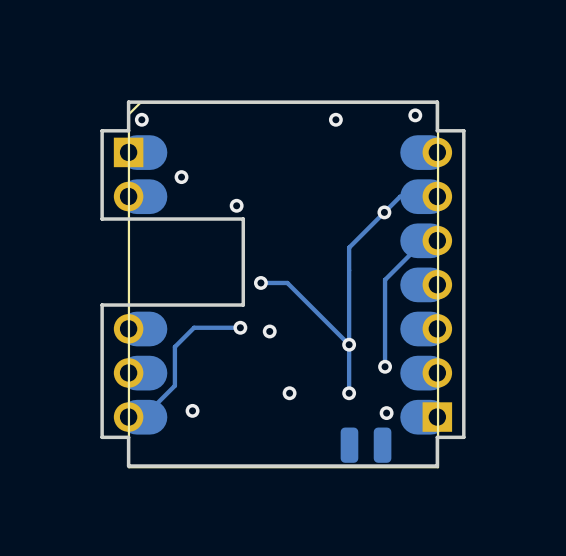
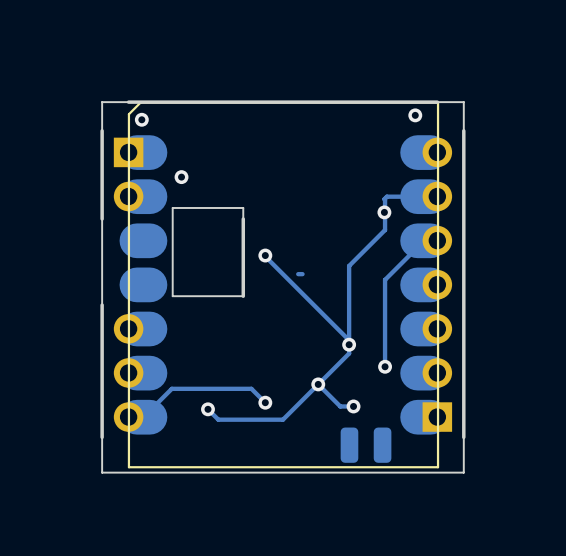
part footprint: [119, 101, 449, 469] -> [119, 101, 449, 469]
board edge: (128, 102) (128, 130) (102, 130) -> (128, 102) (102, 102) (102, 130)
board edge: (437, 102) (437, 130) (463, 130) -> (437, 102) (463, 102) (463, 130)
via: (335, 119) -> none
track: (400, 196) (349, 247) (349, 265) -> (400, 196) (386, 196) (384, 199) (385, 230) (349, 265)
via: (236, 205) -> none
board edge: (243, 219) (102, 219) -> (243, 219) (243, 207) (172, 207) (172, 296) (243, 296)
track: none -> (265, 255) (349, 340)
track: none -> (302, 274) (298, 274)
track: (260, 282) (287, 282) (349, 344) -> none
via position: (260, 282) -> (265, 255)
board edge: (243, 296) (243, 305) (102, 305) -> (102, 219) (102, 305)
track: (240, 327) (194, 327) (174, 346) (174, 385) (171, 388) -> (265, 402) (251, 388) (171, 388)
via: (240, 327) -> none
via: (269, 331) -> none
track: (349, 353) (349, 393) -> (349, 353) (282, 419) (218, 419) (207, 409)
track: none -> (318, 384) (340, 406) (353, 406)
via: none -> (318, 384)
via: (289, 393) -> none
via position: (349, 393) -> (353, 406)
via: none -> (265, 402)
via position: (192, 410) -> (207, 409)
via: (386, 413) -> none
board edge: (463, 437) (437, 437) (437, 466) (128, 466) (128, 437) (102, 437) -> (463, 437) (463, 472) (102, 472) (102, 437)

